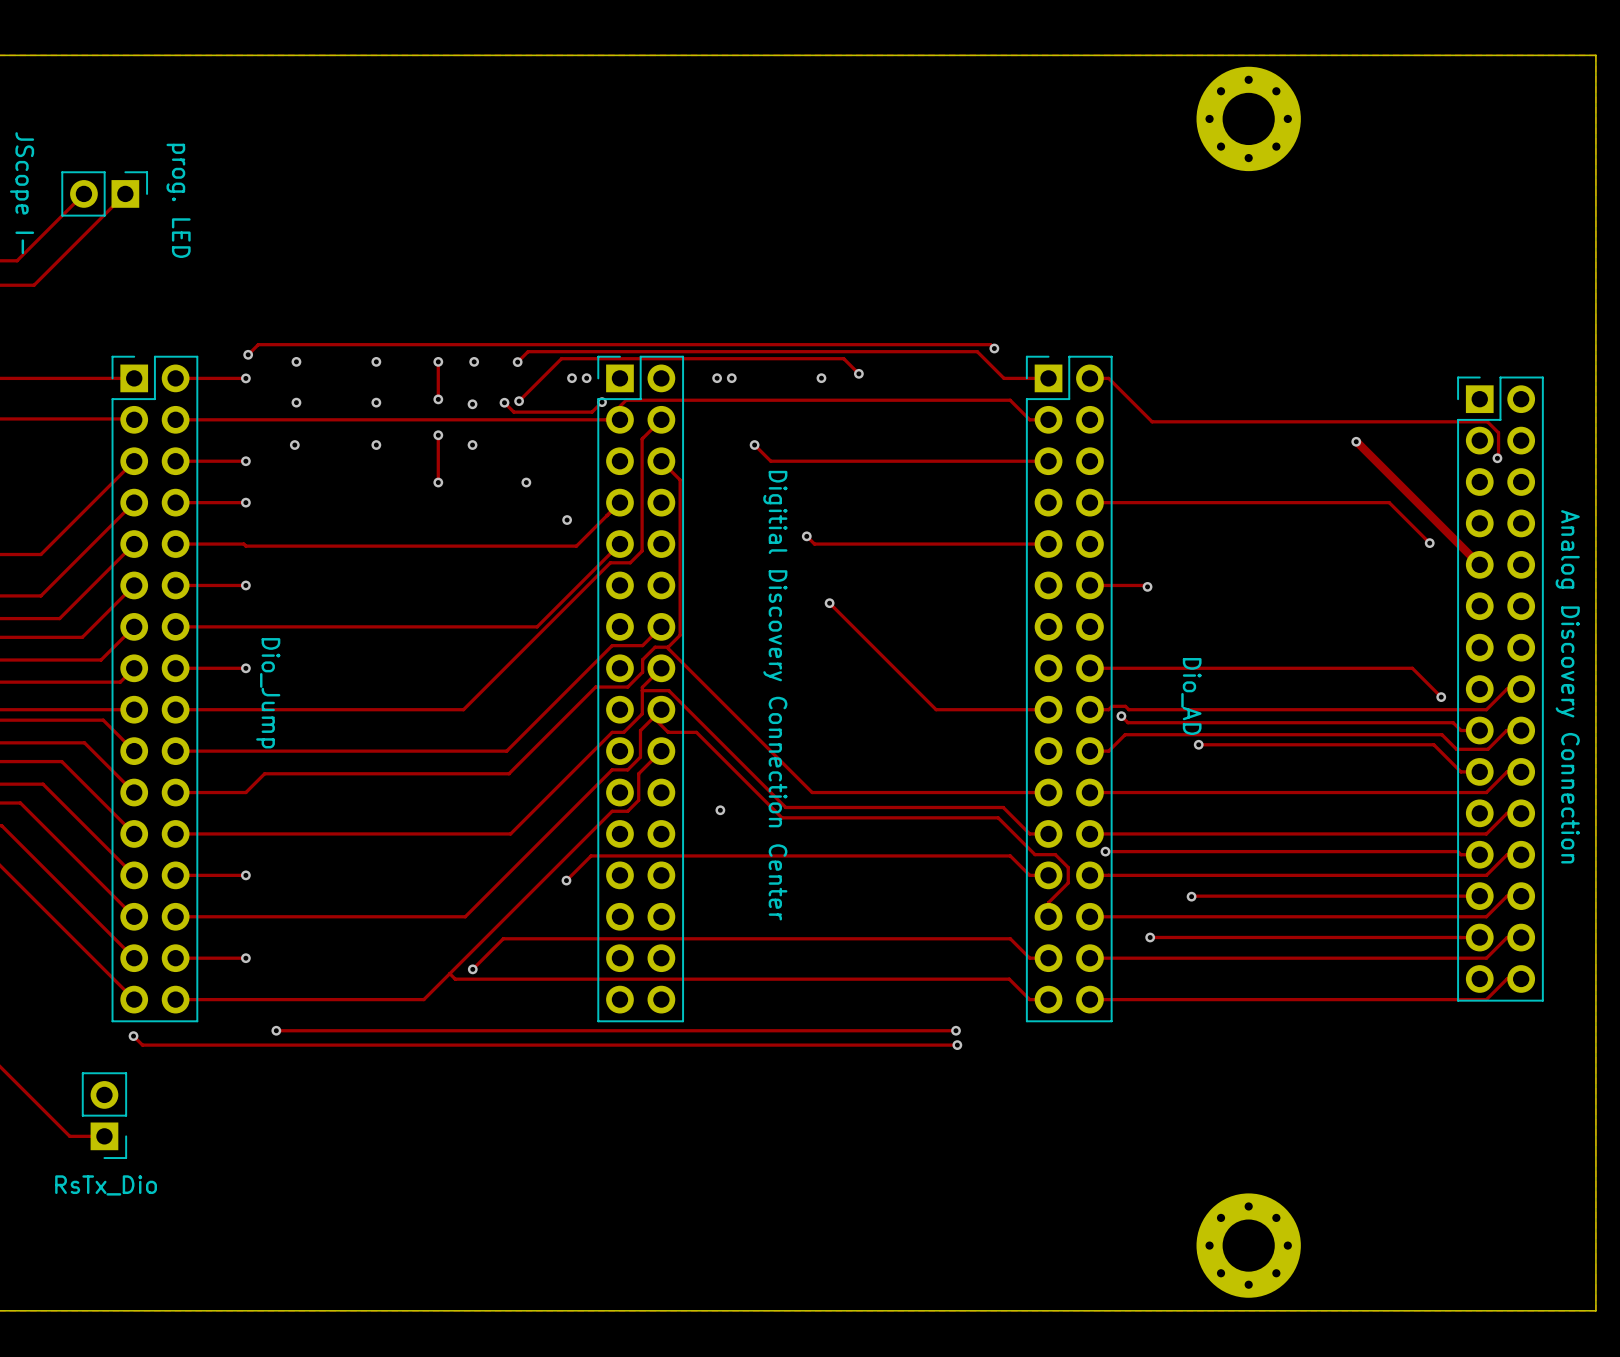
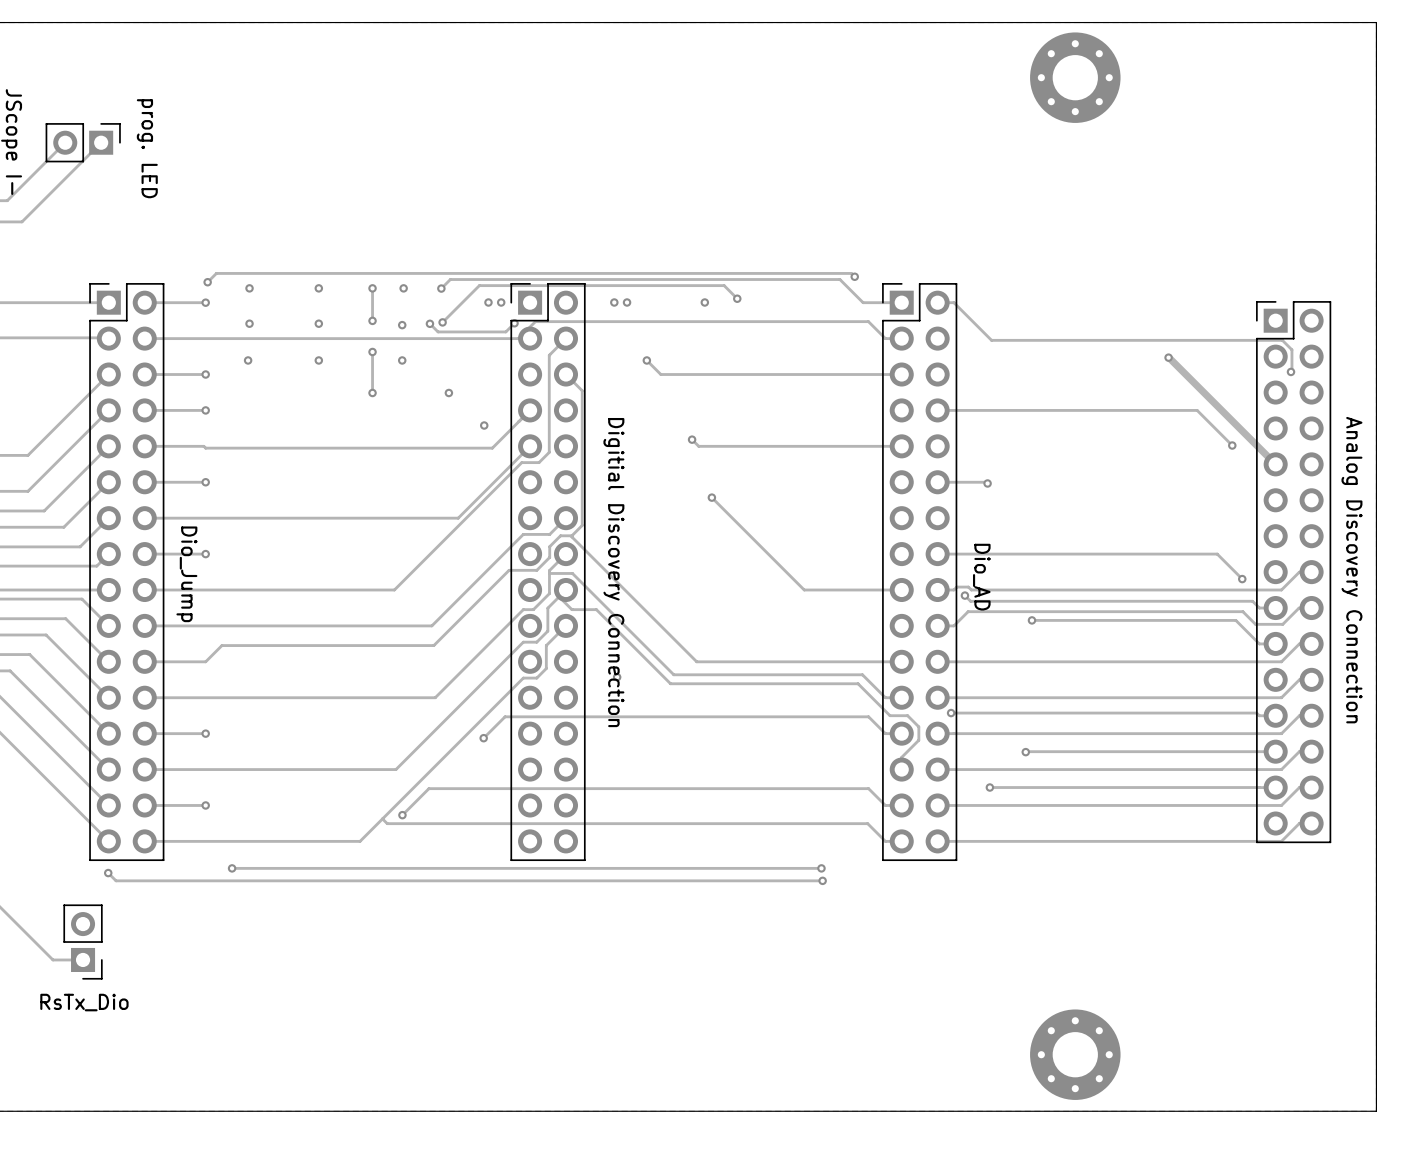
part value position: Dio_Jump (268, 693) -> Dio_Jump (186, 574)
part value: Digitial Discovery Connection Center (775, 695) -> Digitial Discovery Connection (613, 572)
part value position: Dio_AD (1191, 696) -> Dio_AD (981, 577)

